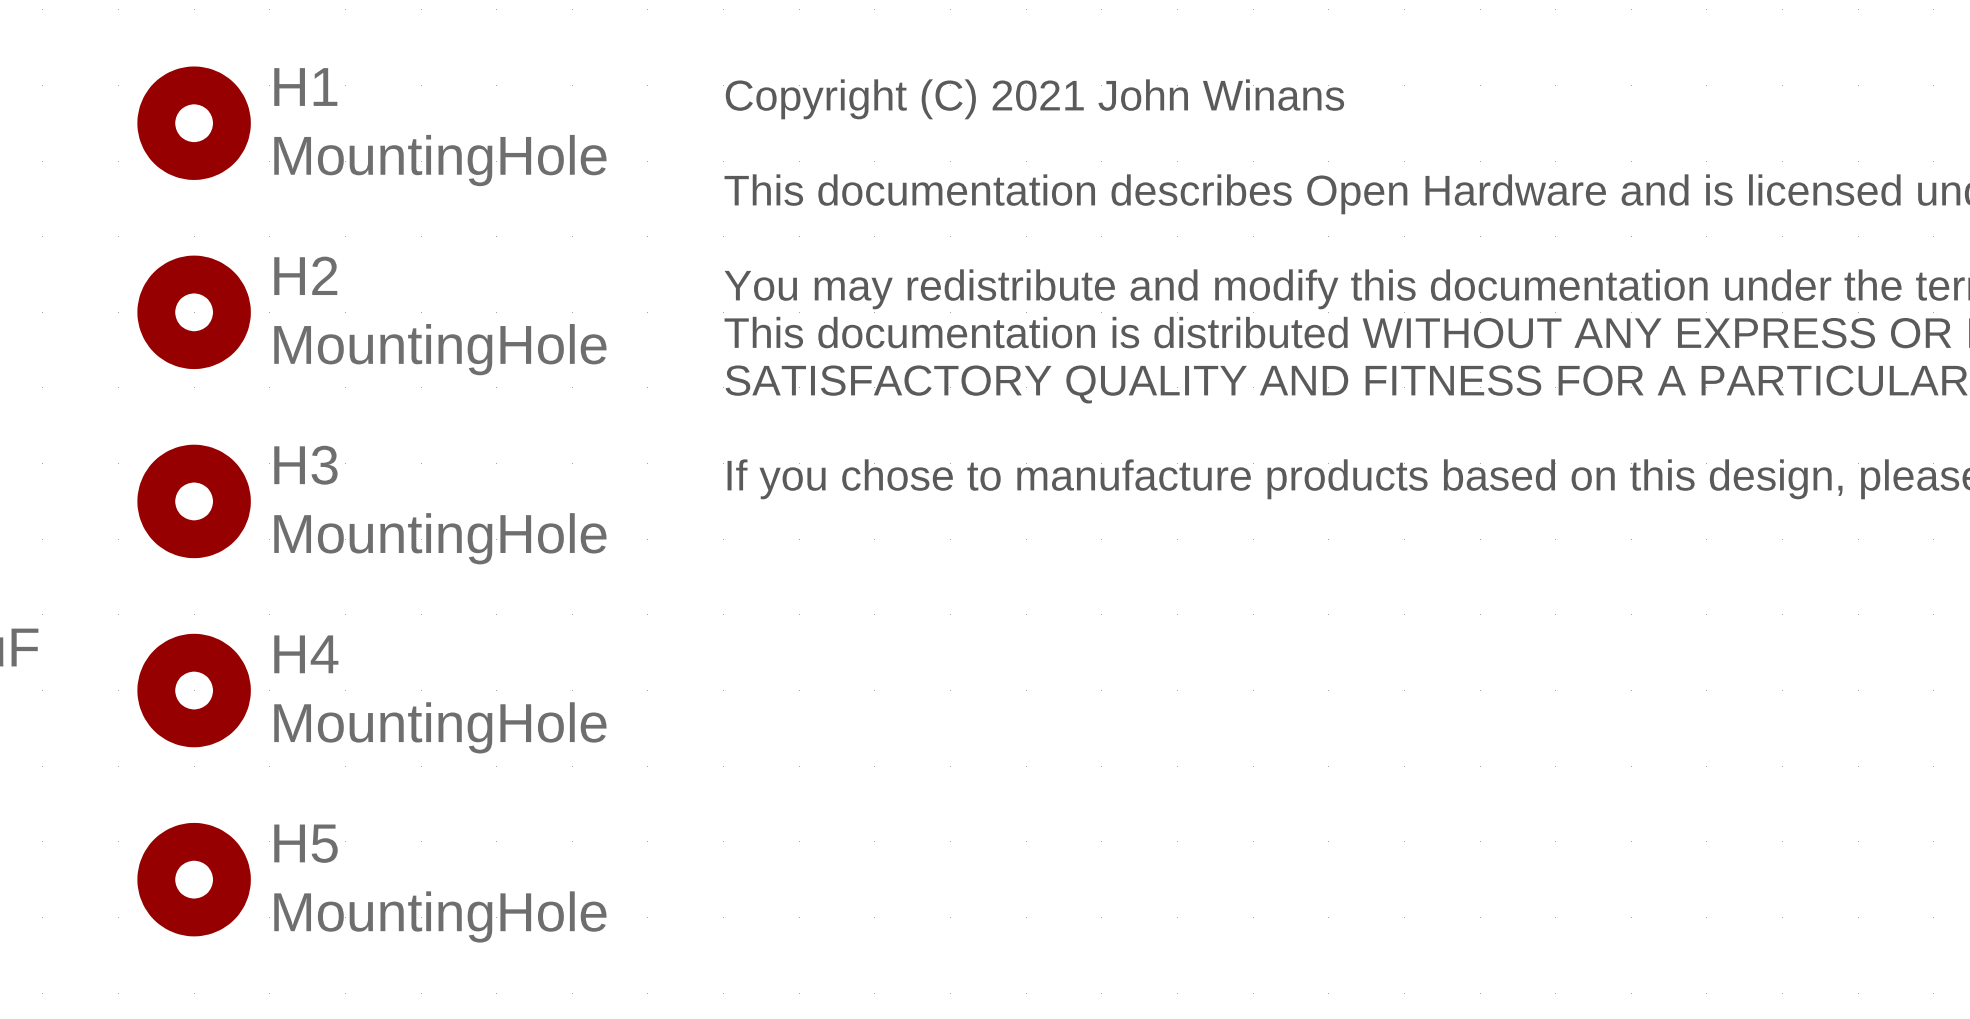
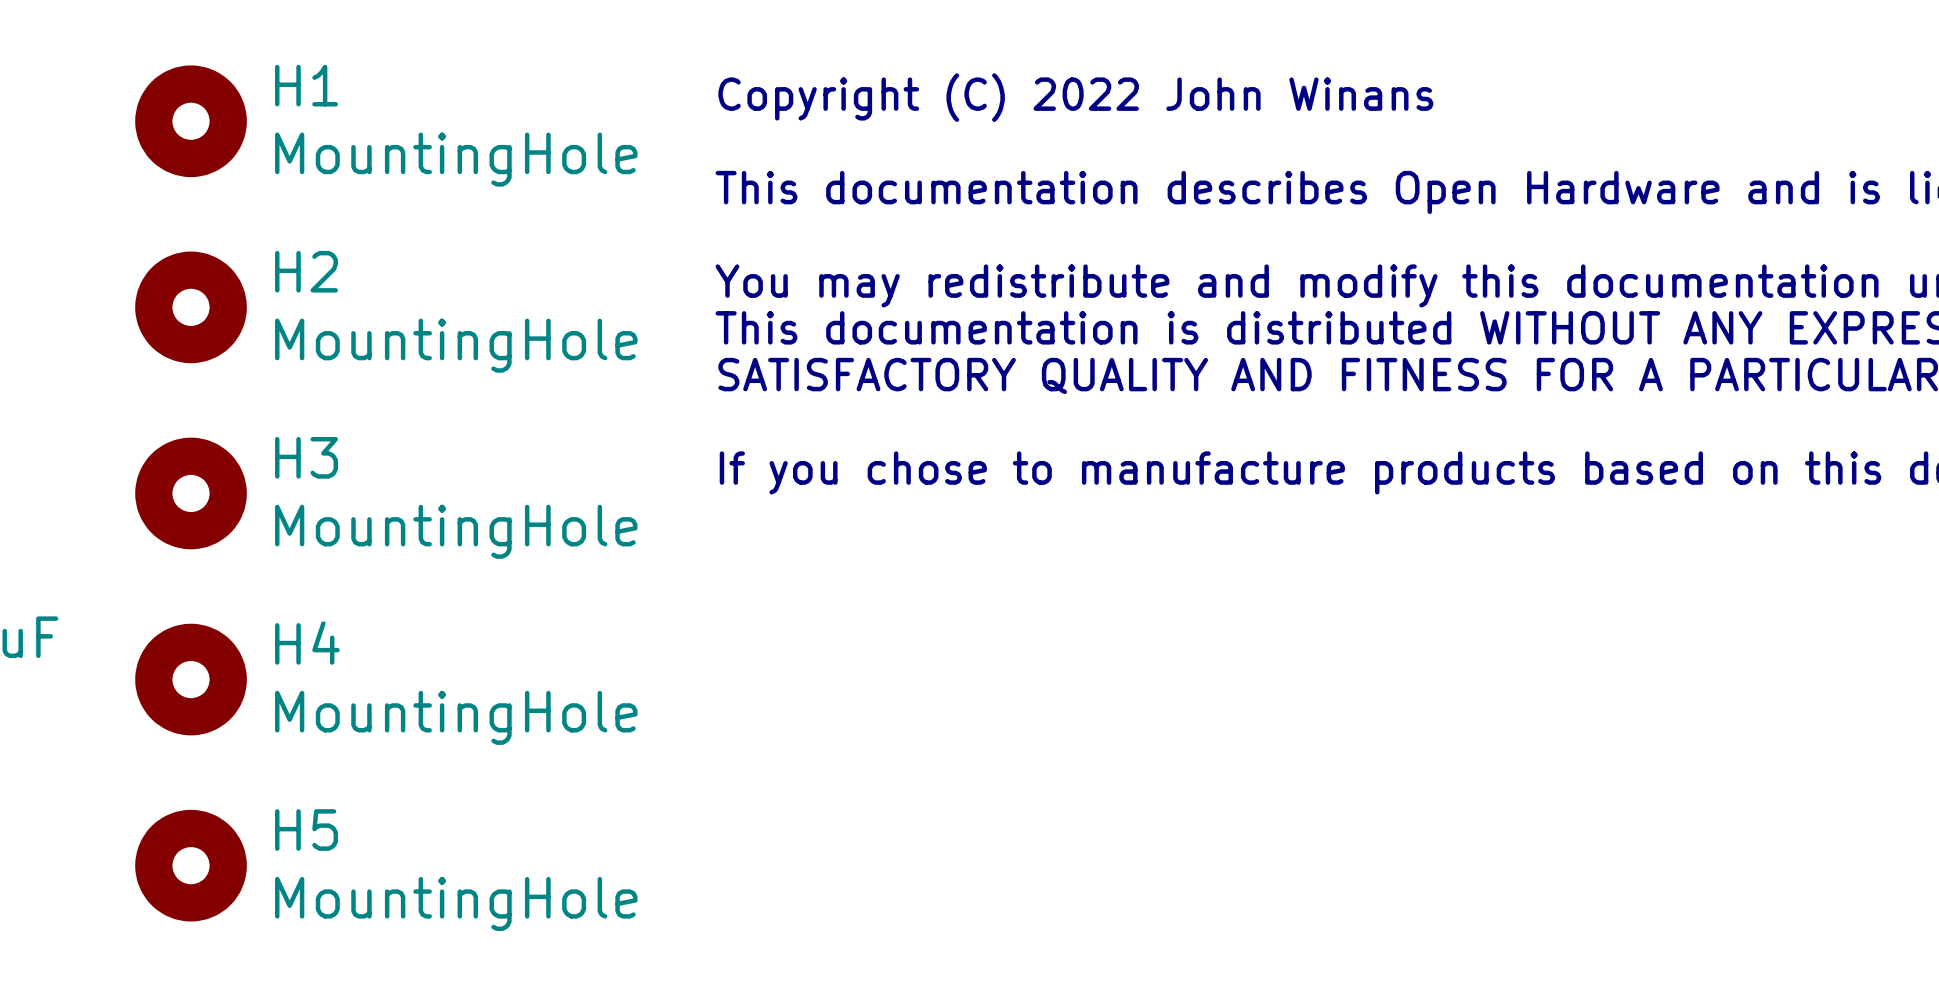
text: Copyright (C) 2021 John Winans (1034, 99) -> Copyright (C) 2022 John Winans (1075, 97)

